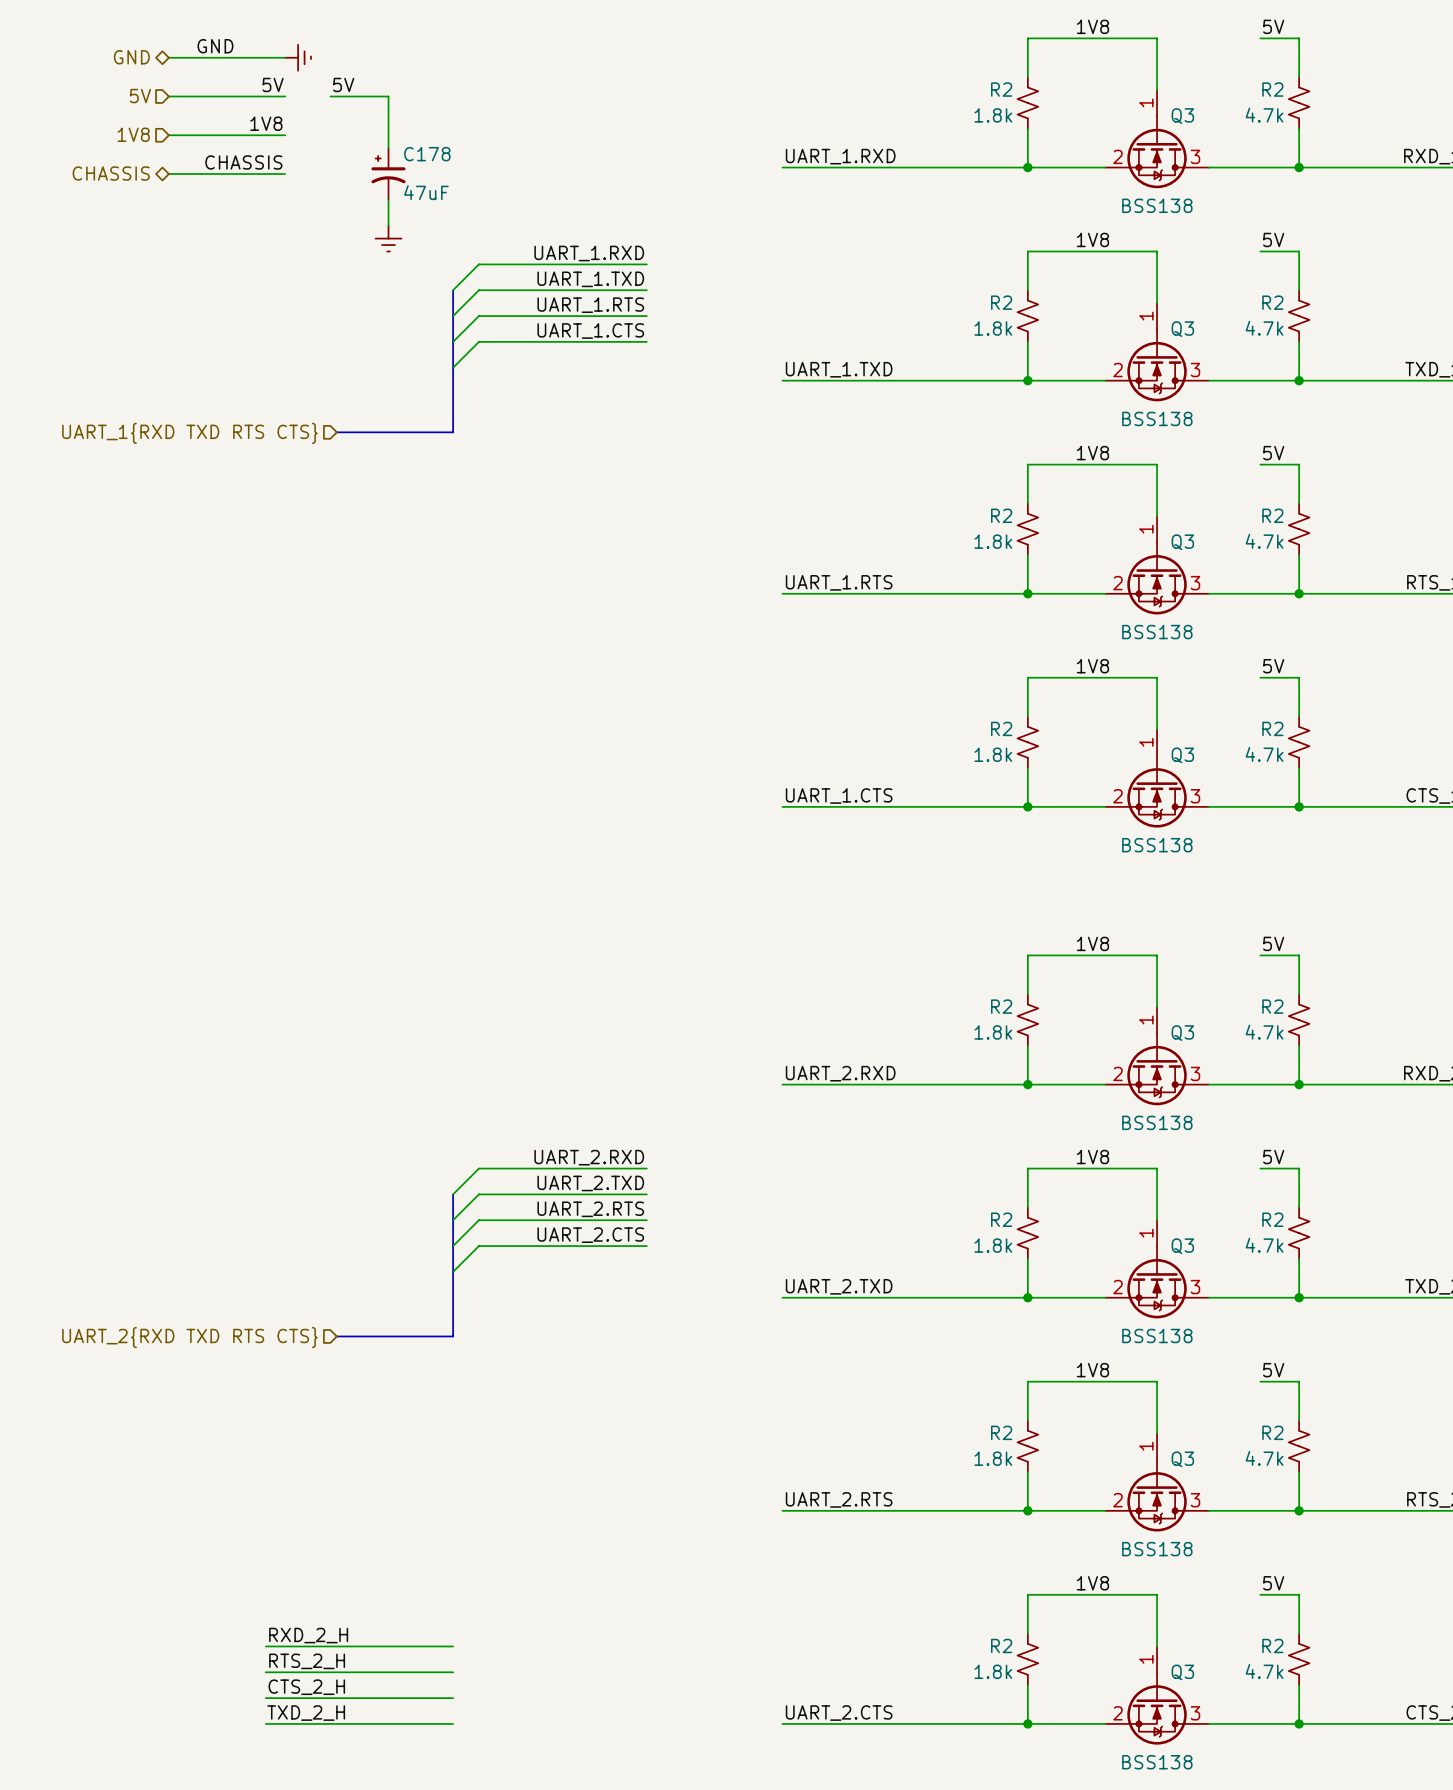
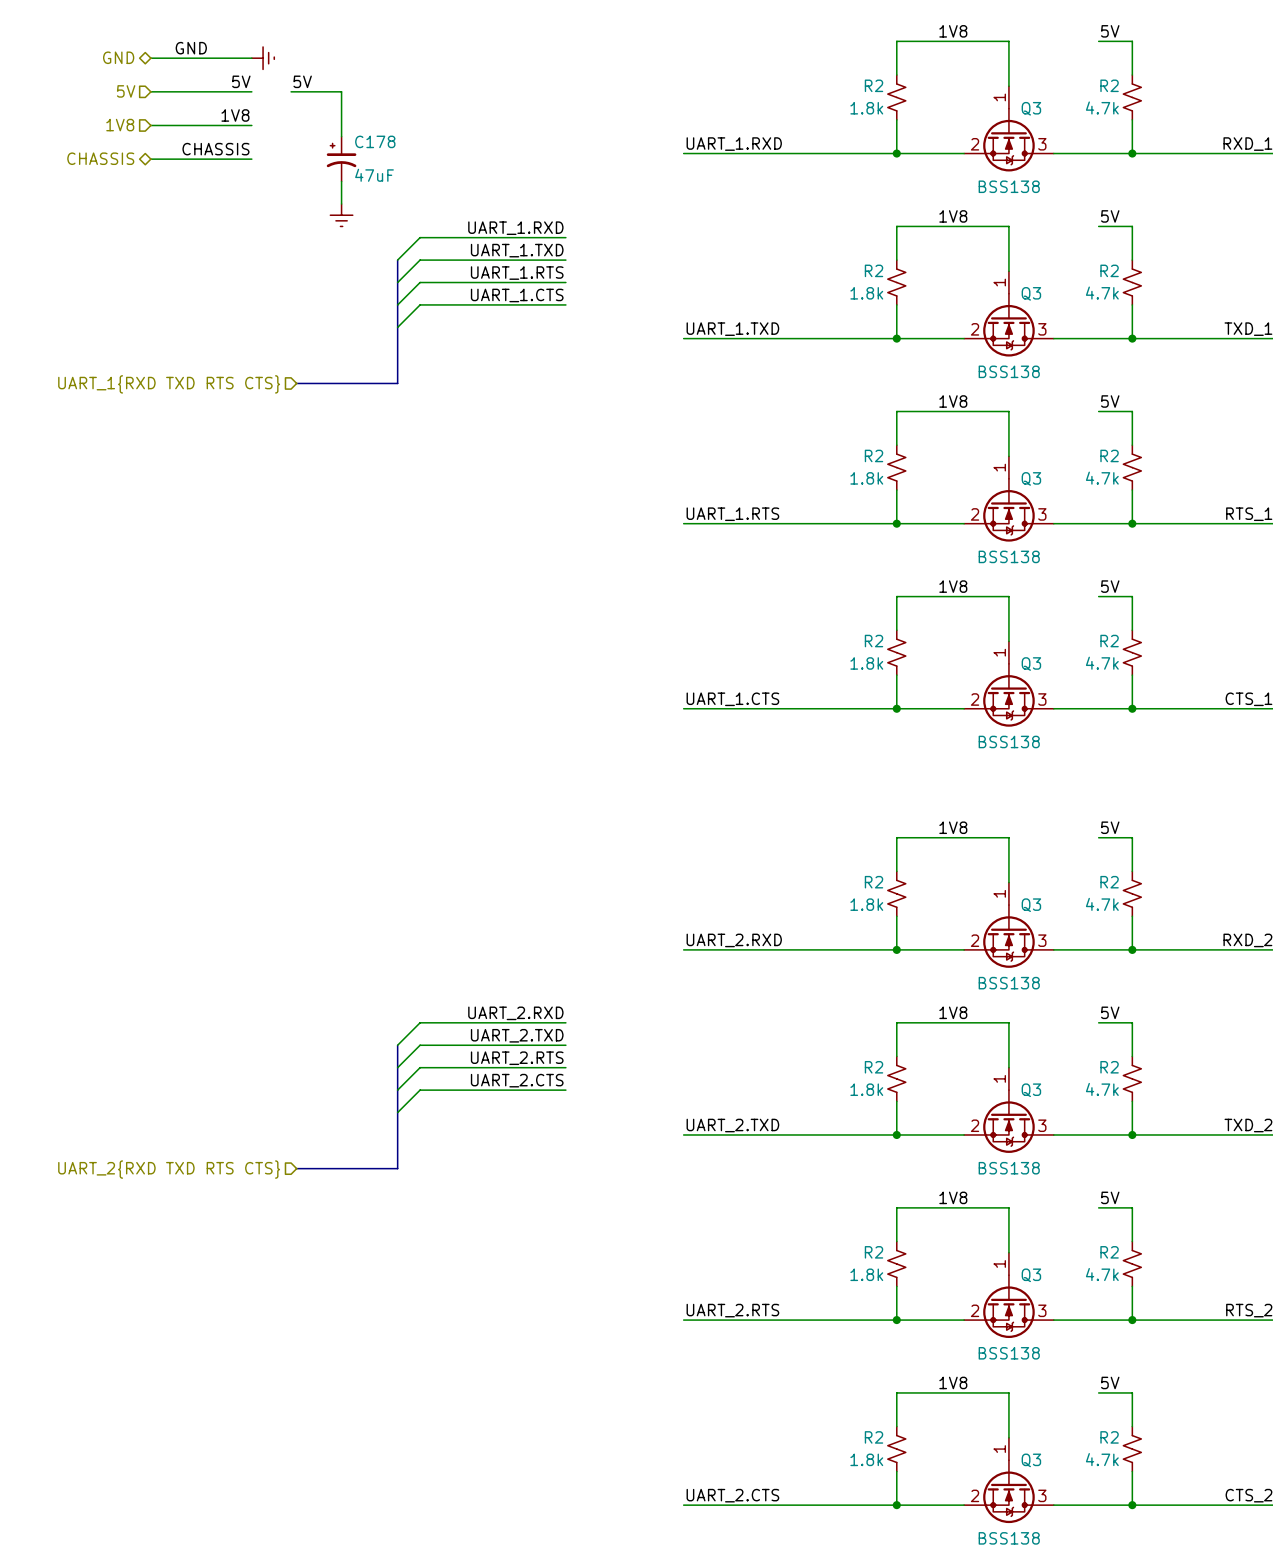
label: RXD_2_H (308, 1635) -> none
wire: (265, 1646) (453, 1646) -> none
label: RTS_2_H (307, 1661) -> none
wire: (265, 1672) (453, 1672) -> none
label: CTS_2_H (306, 1687) -> none
wire: (265, 1698) (453, 1698) -> none
label: TXD_2_H (306, 1713) -> none
wire: (265, 1723) (453, 1723) -> none

